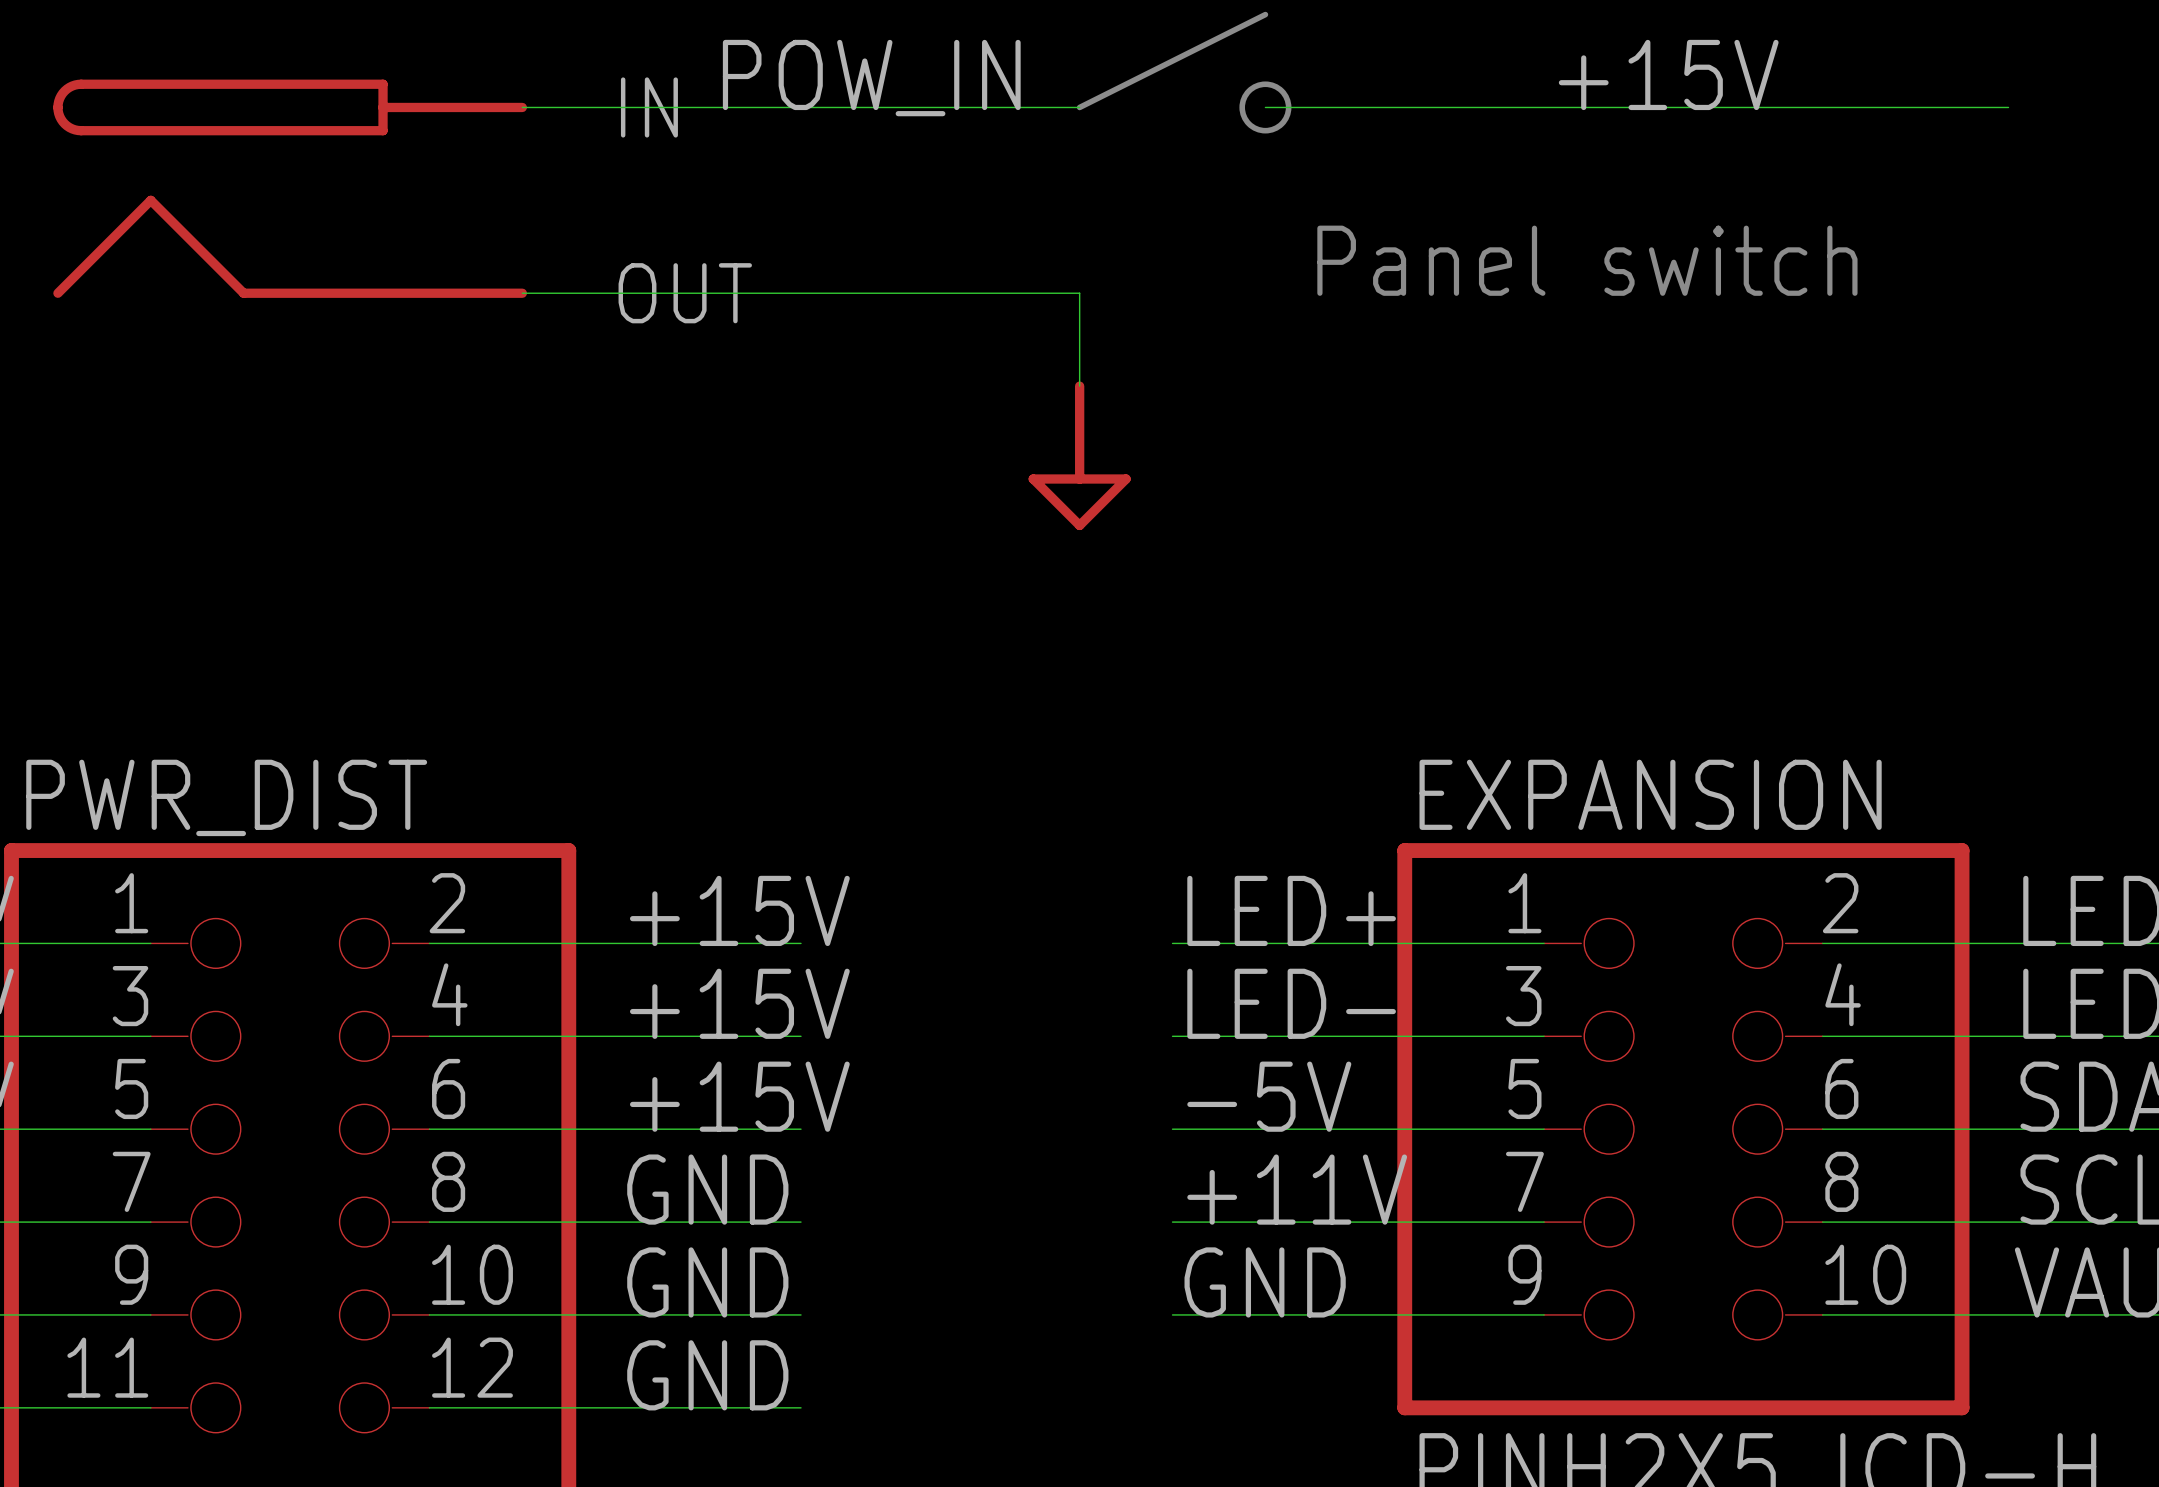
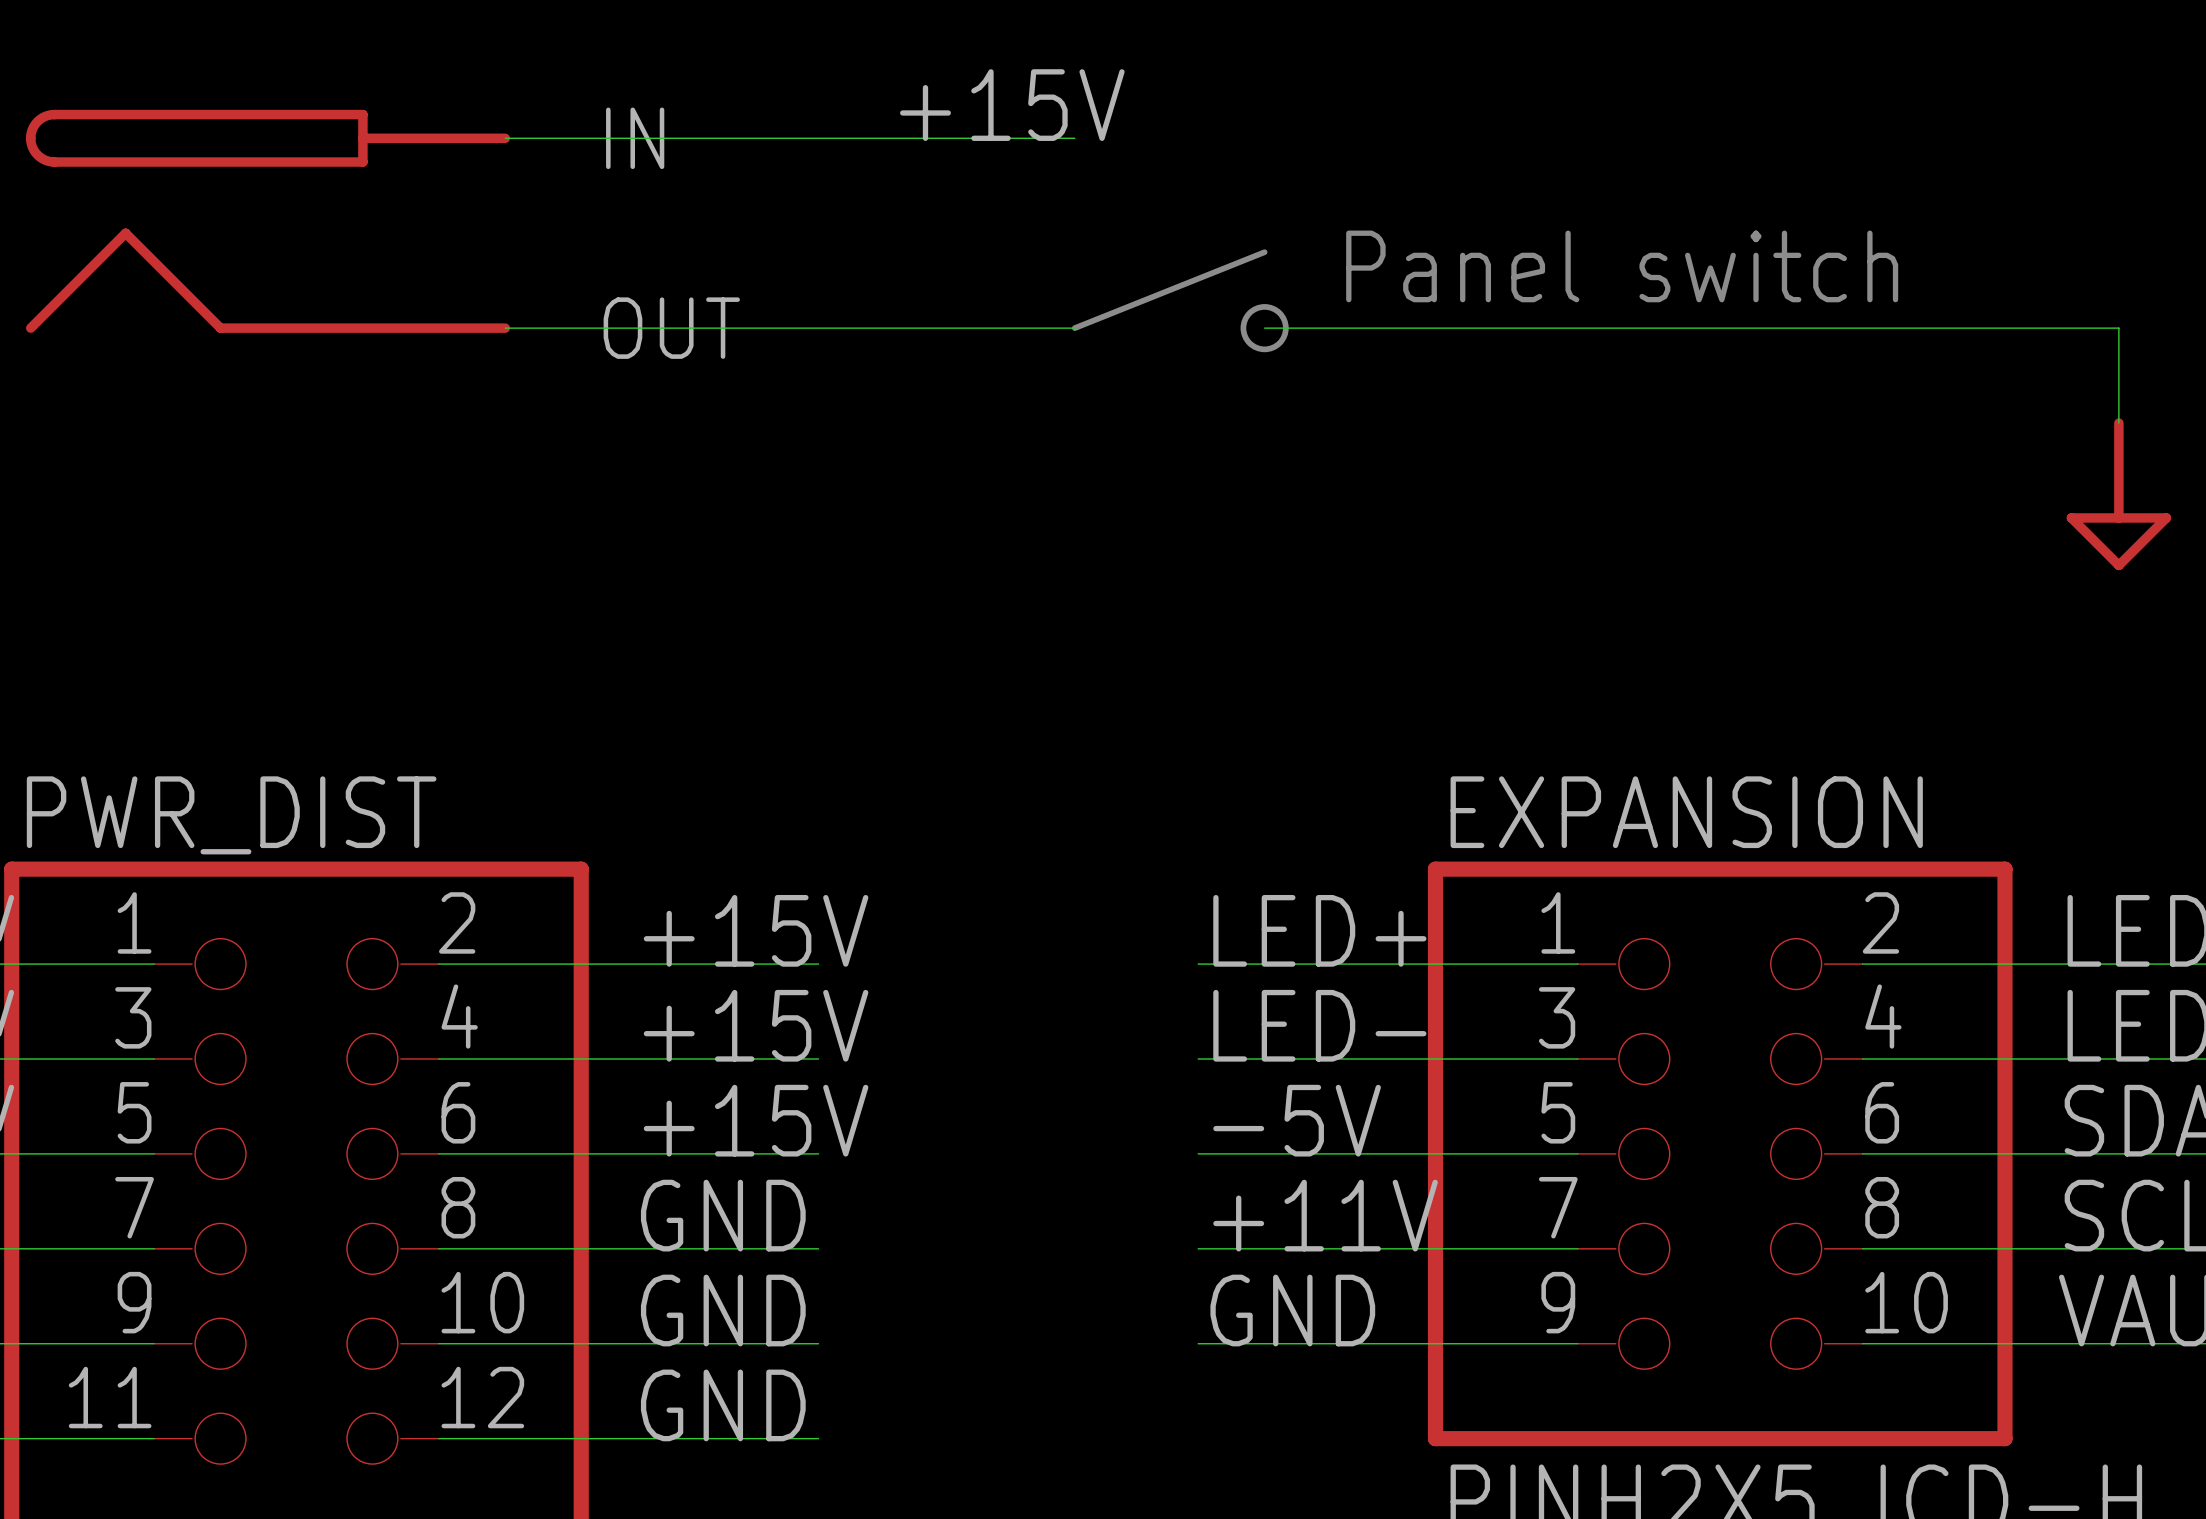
line: (1265, 14) (1079, 107) -> none
label position: +15V (1668, 74) -> +15V (1012, 105)
label: POW_IN (871, 78) -> none
drawing: [1239, 81, 1292, 134] -> none
wire: (522, 107) (1079, 107) -> (505, 138) (1074, 138)
wire: (1265, 107) (2008, 107) -> none
part position: (290, 188) -> (268, 221)
line: none -> (1264, 252) (1074, 328)
wire: (522, 293) (1079, 293) (1079, 386) -> none
drawing: none -> [1240, 304, 1289, 353]
wire: none -> (505, 328) (1074, 328)
wire: none -> (1264, 328) (2118, 328) (2118, 423)
part: (1079, 455) -> none
part: none -> (2118, 494)

